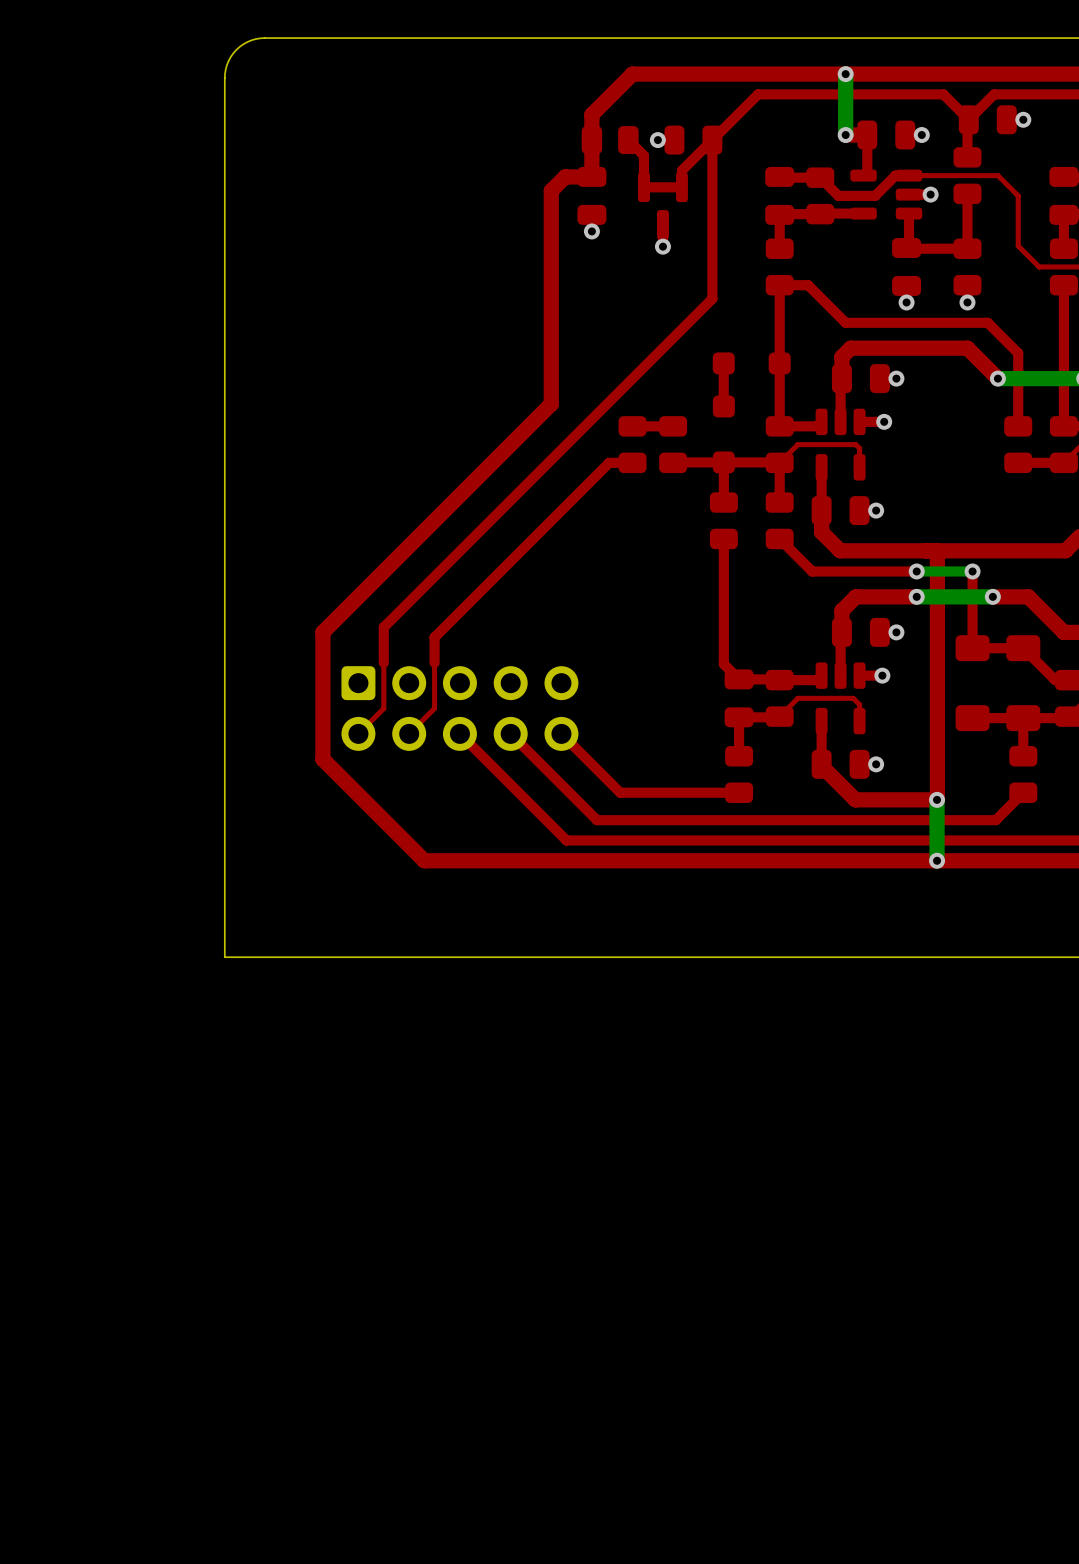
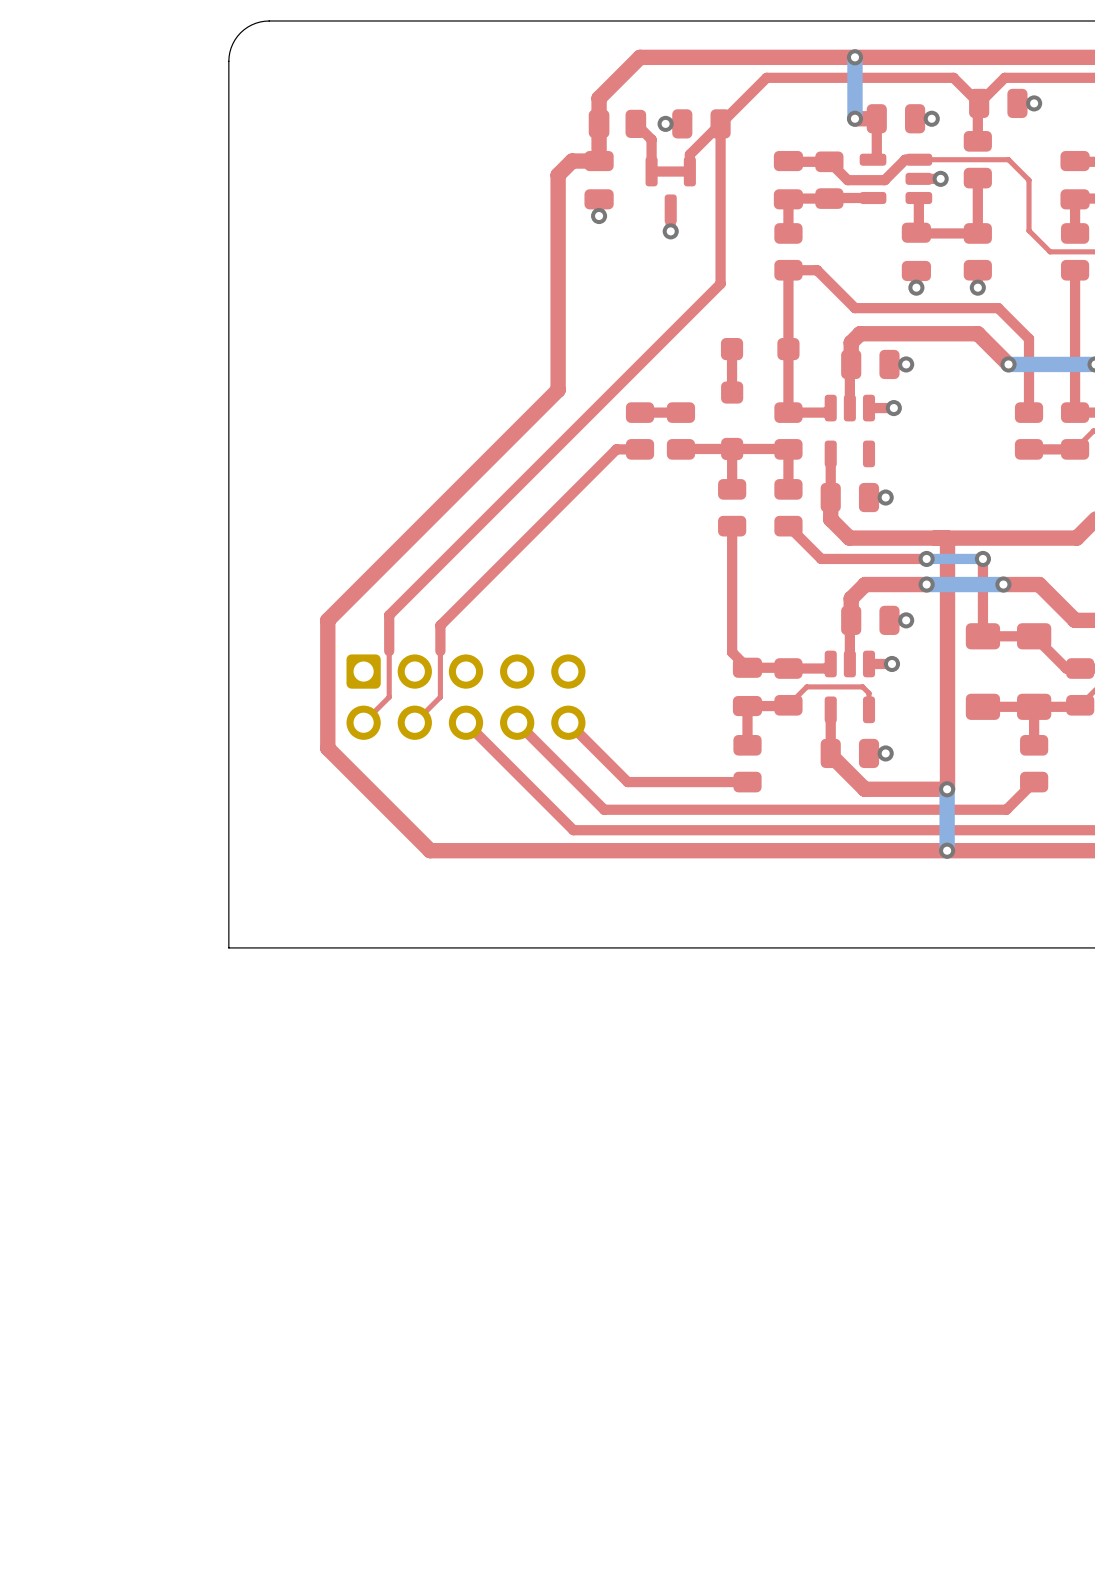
top track: (779, 462) (797, 444) (855, 444) (859, 448) (859, 467) -> none

